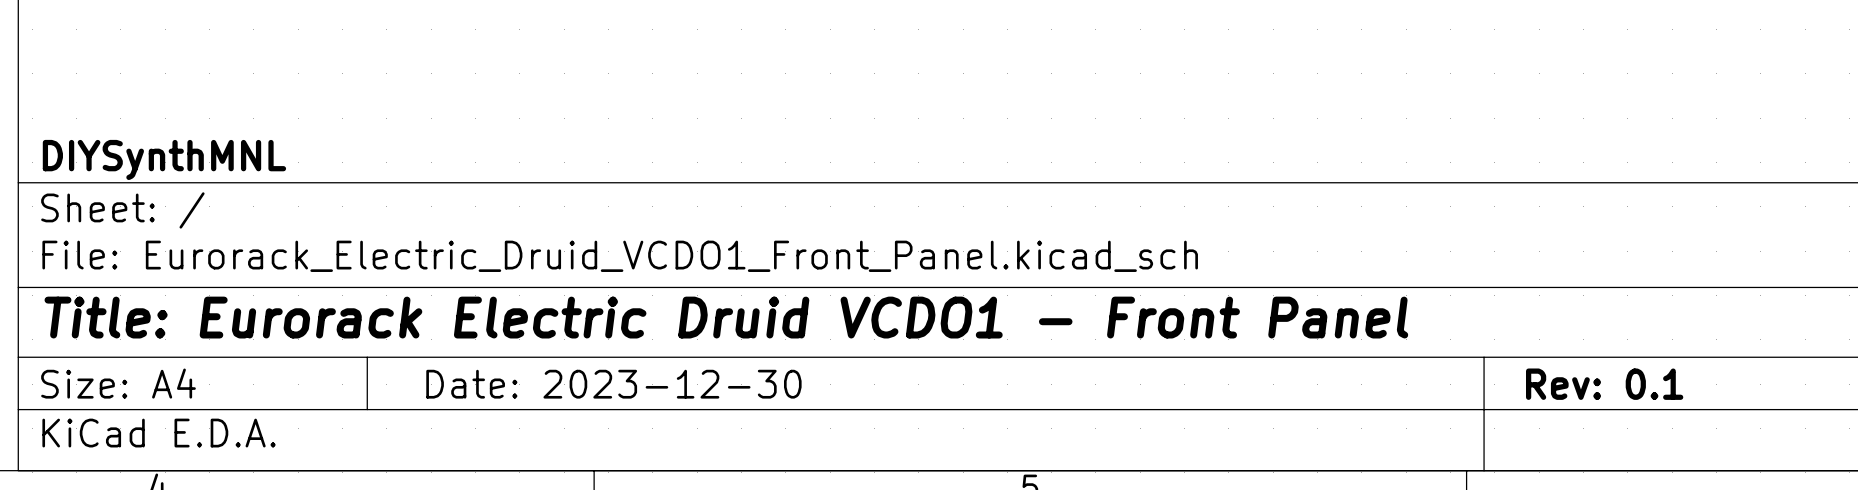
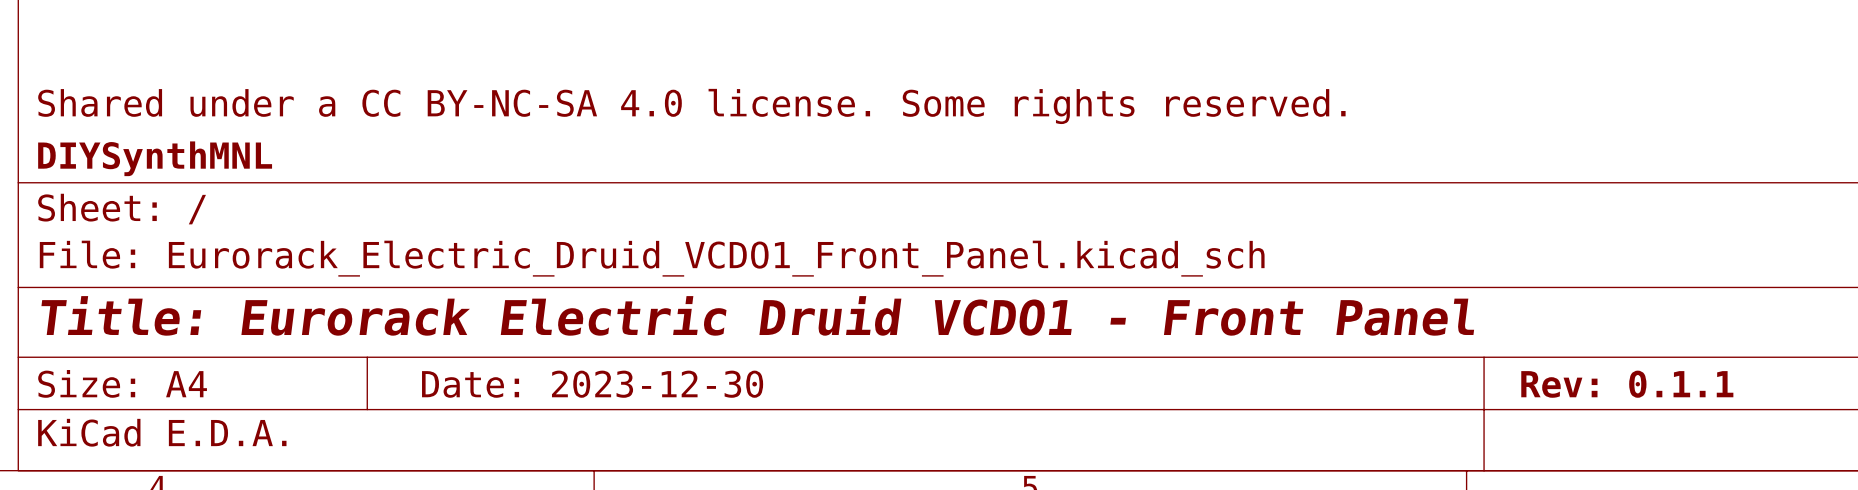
title block: none -> Shared under a CC BY-NC-SA 4.0 license. Some rights reserved. (691, 106)
title block: Rev: 0.1 (1604, 384) -> Rev: 0.1.1 (1627, 384)

